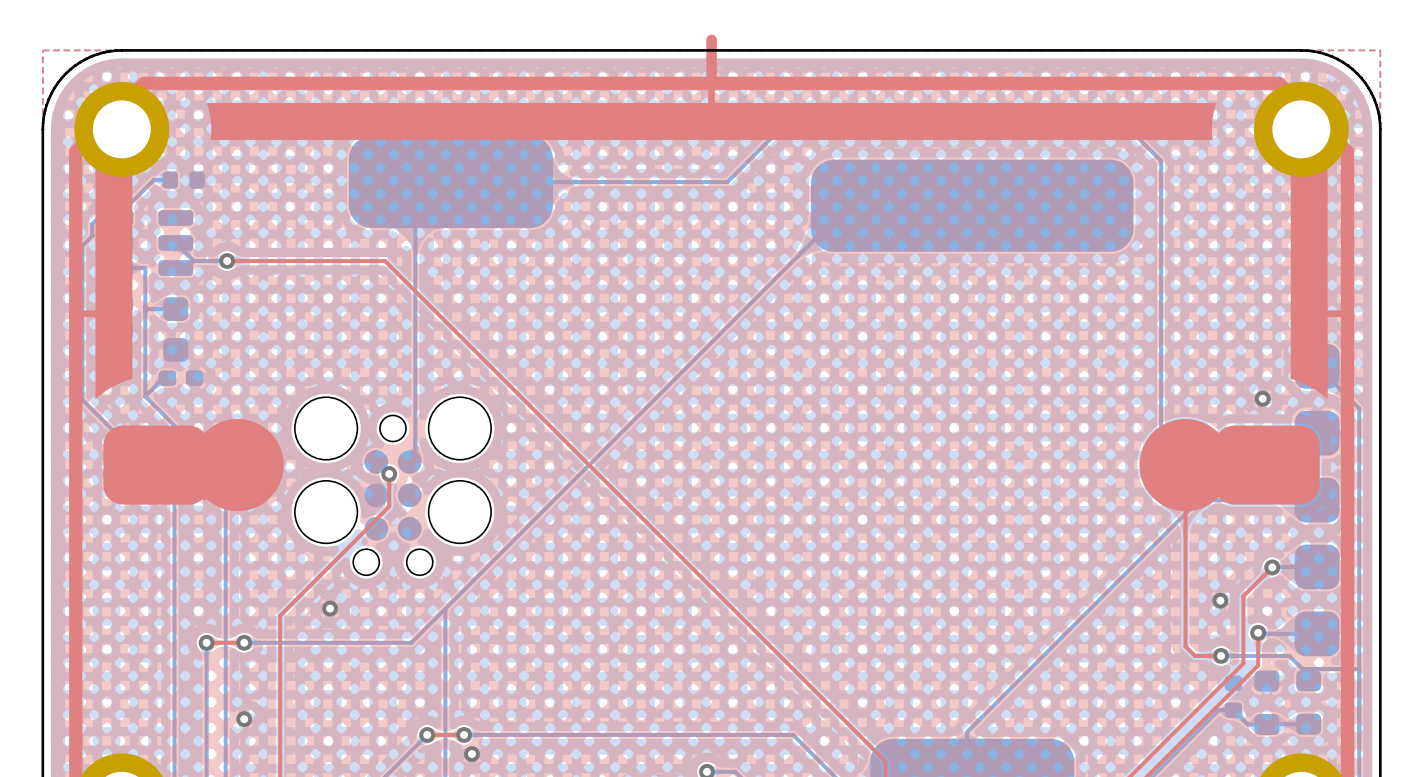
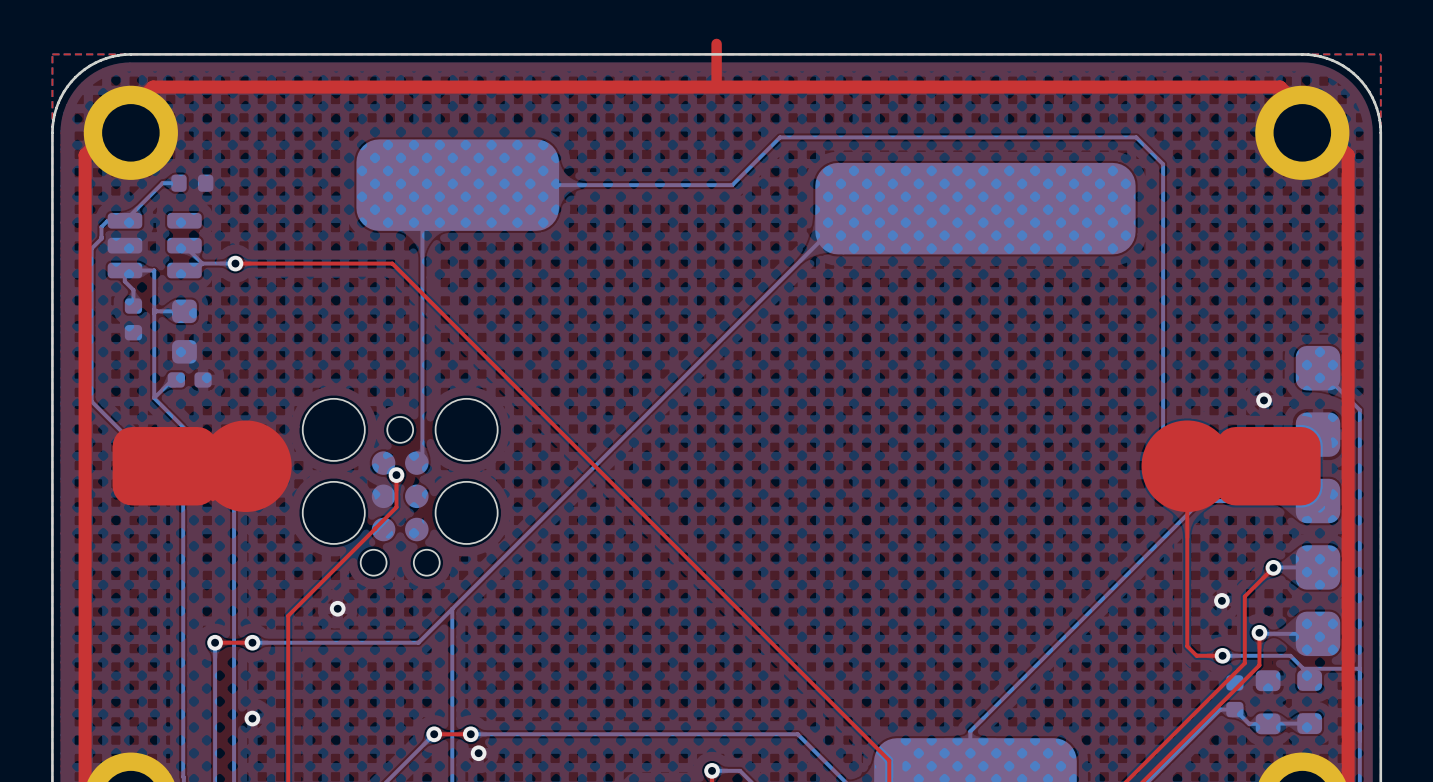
top track: (711, 82) (711, 105) -> none
drawing: [206, 103, 1217, 140] -> none
drawing: [95, 161, 133, 400] -> none
drawing: [1290, 161, 1328, 400] -> none
top track: (74, 313) (98, 313) -> none
top track: (1325, 313) (1348, 313) -> none

